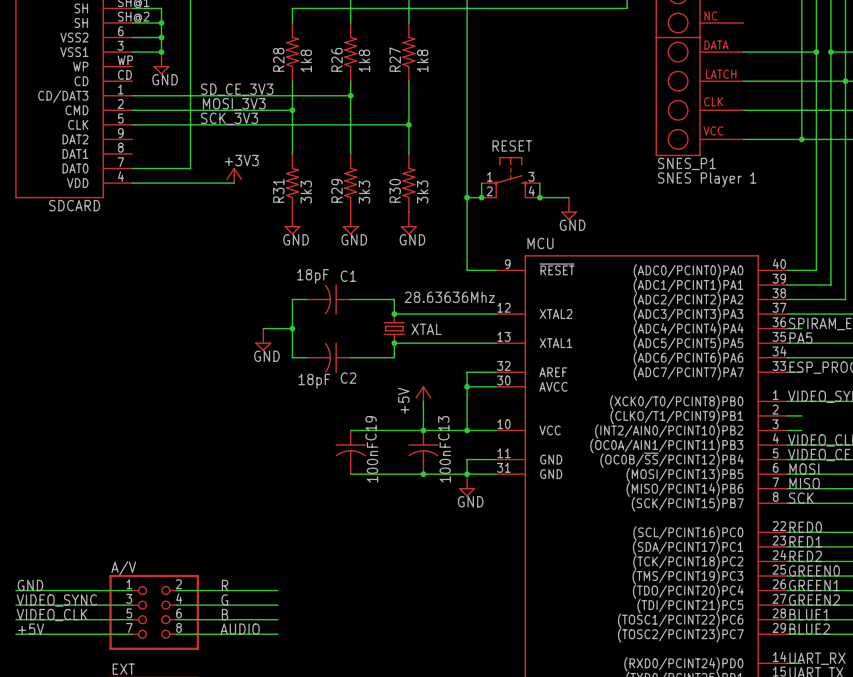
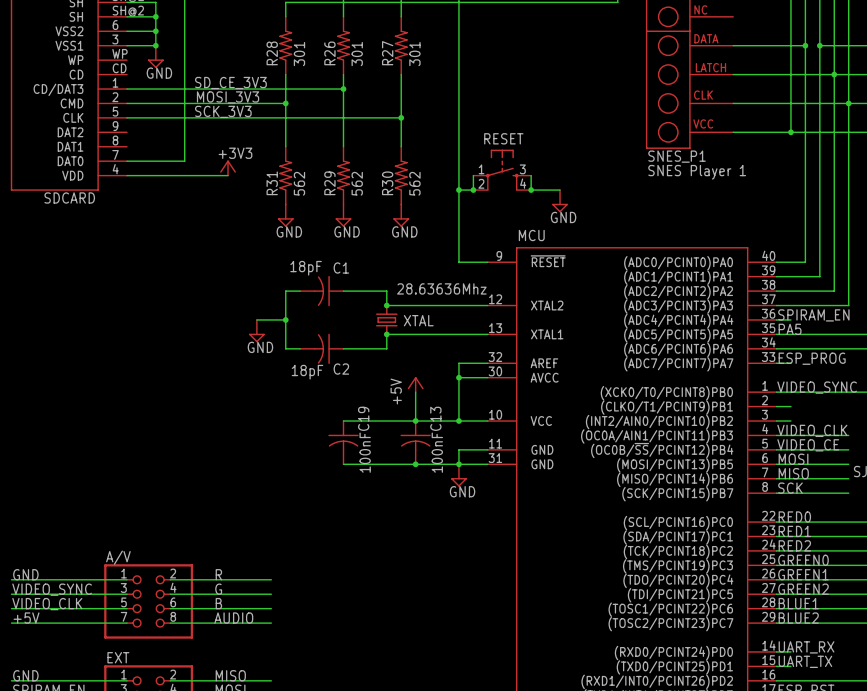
R28 value: 1k8 (306, 60) -> 301 (299, 54)
R26 value: 1k8 (364, 60) -> 301 (357, 54)
R27 value: 1k8 (422, 60) -> 301 (414, 54)
R31 value: 3k3 (306, 192) -> 562 (299, 183)
R29 value: 3k3 (364, 192) -> 562 (357, 183)
R30 value: 3k3 (422, 192) -> 562 (414, 183)

